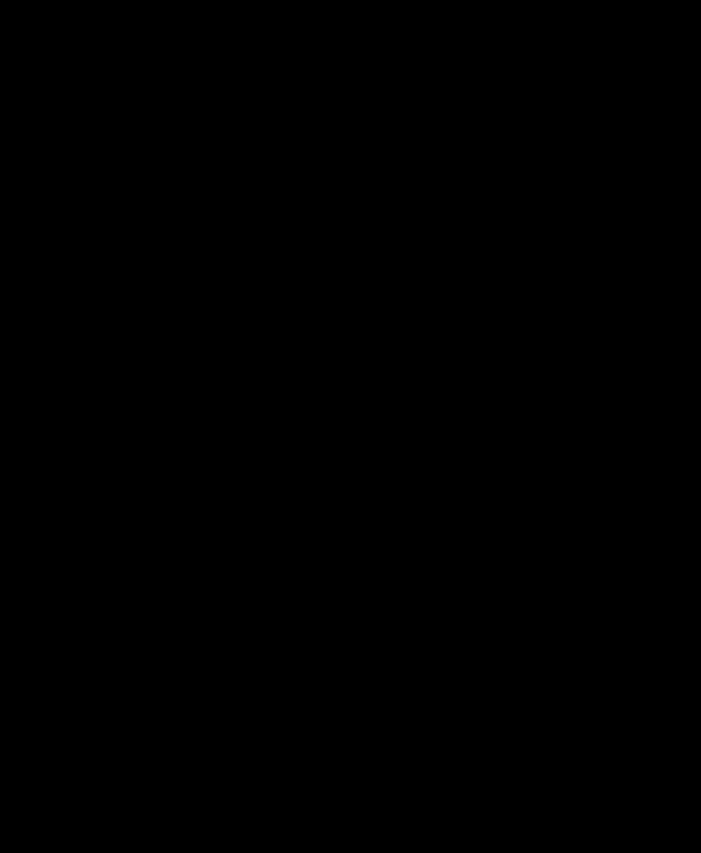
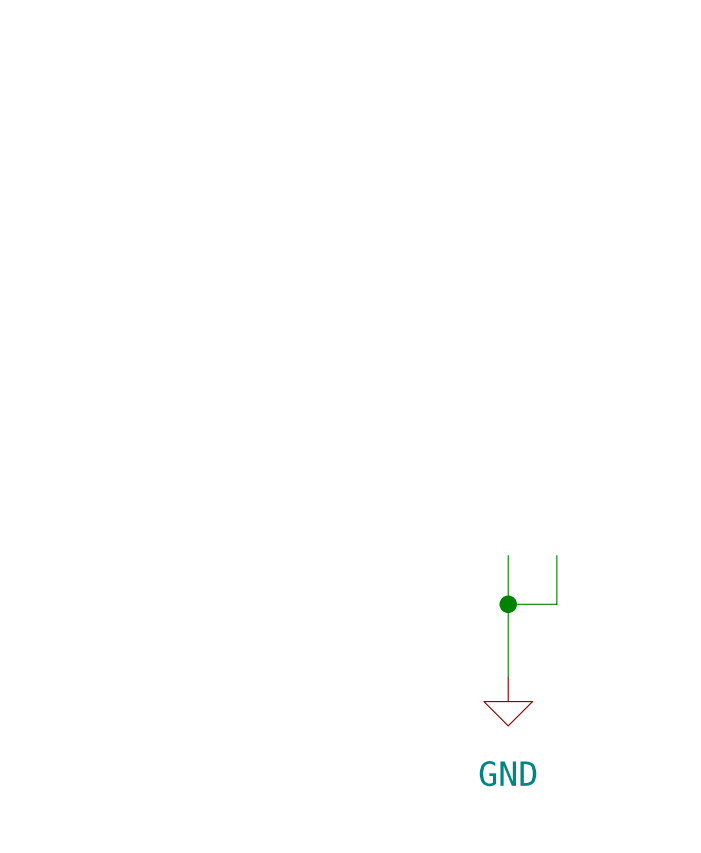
wire: none -> (508, 555) (508, 677)
wire: none -> (556, 555) (556, 604) (508, 604)
junction: none -> (508, 604)
power symbol: none -> GND (508, 701)

